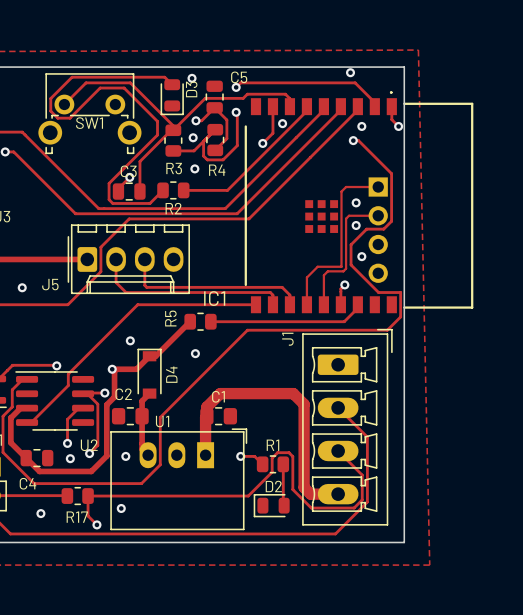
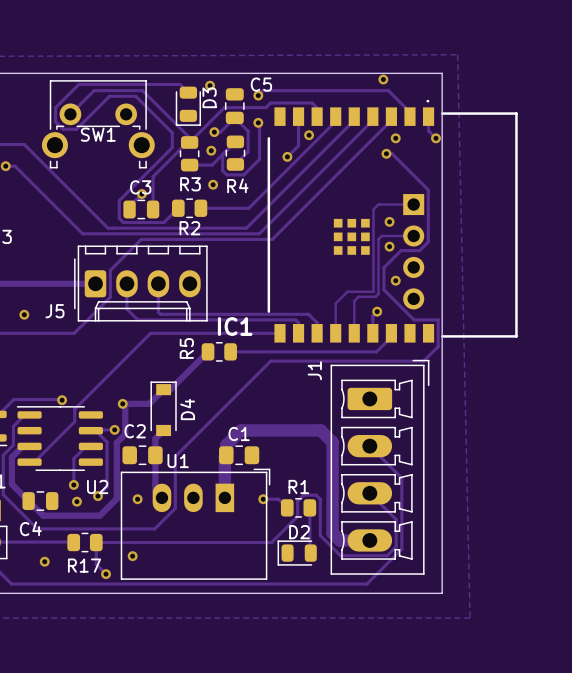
via: (130, 340) -> none
via: (195, 353) -> none

